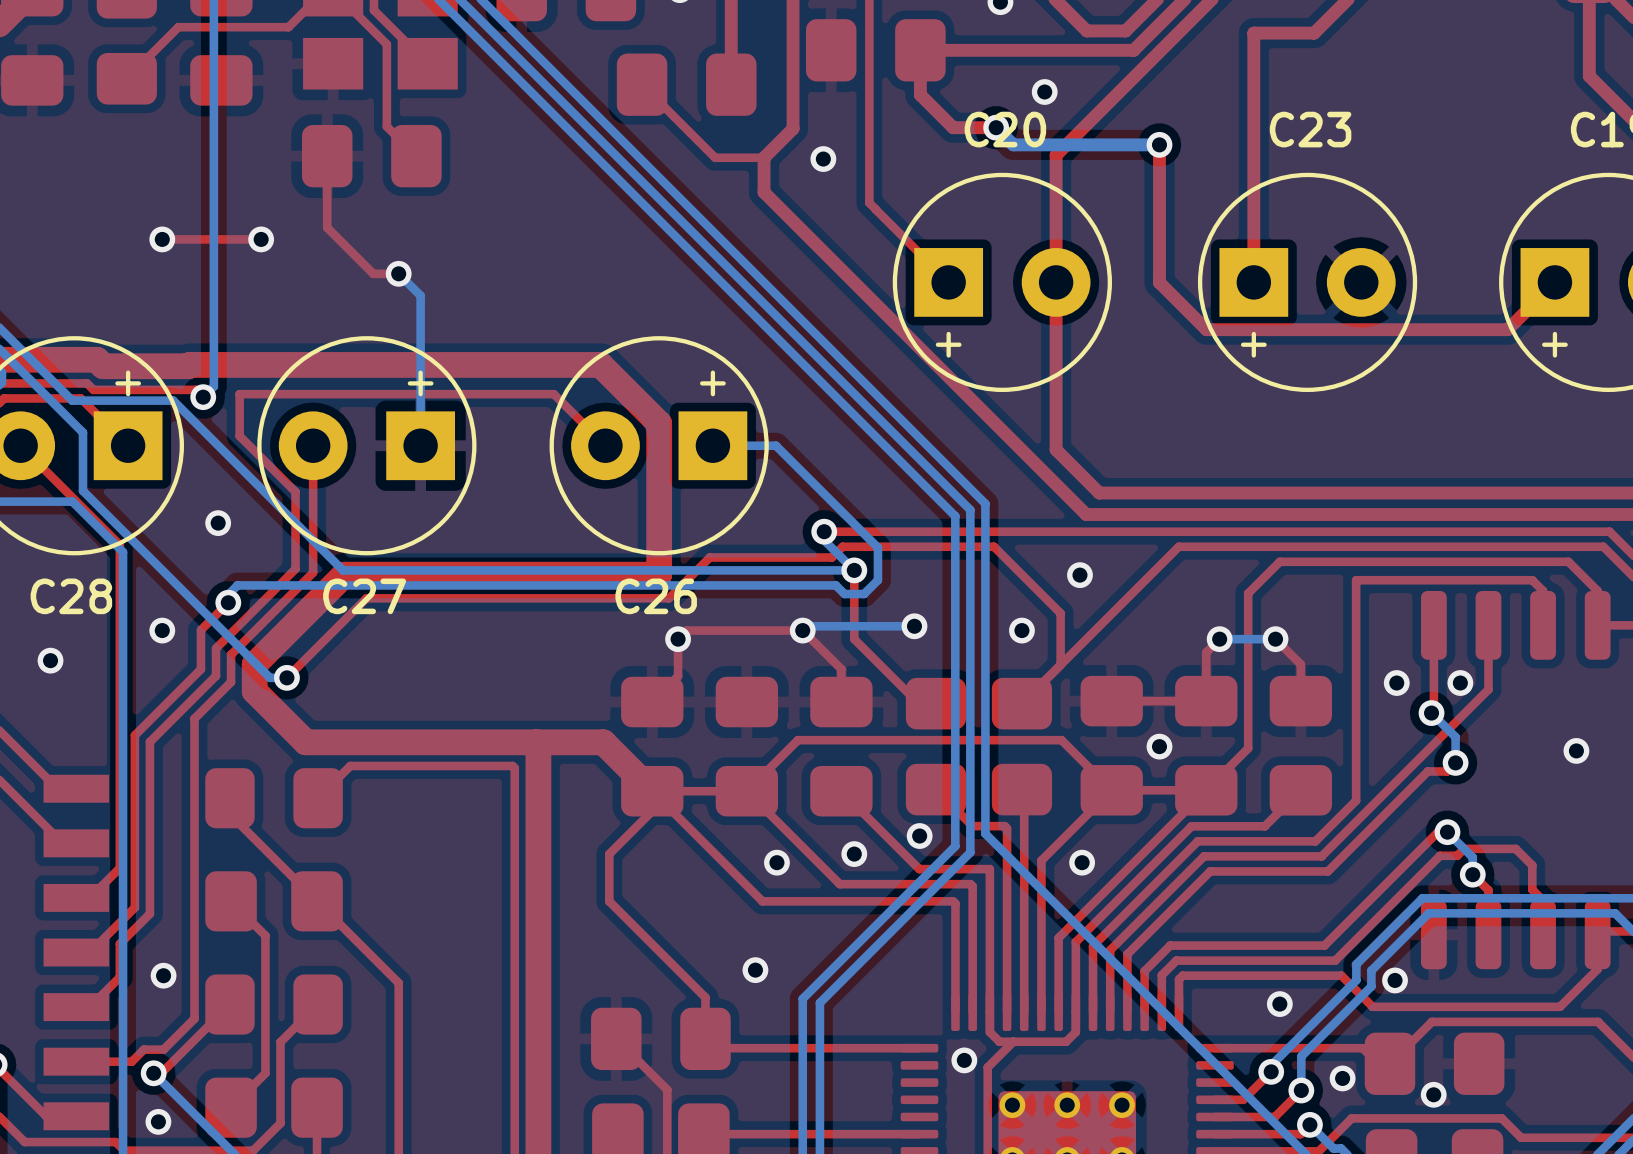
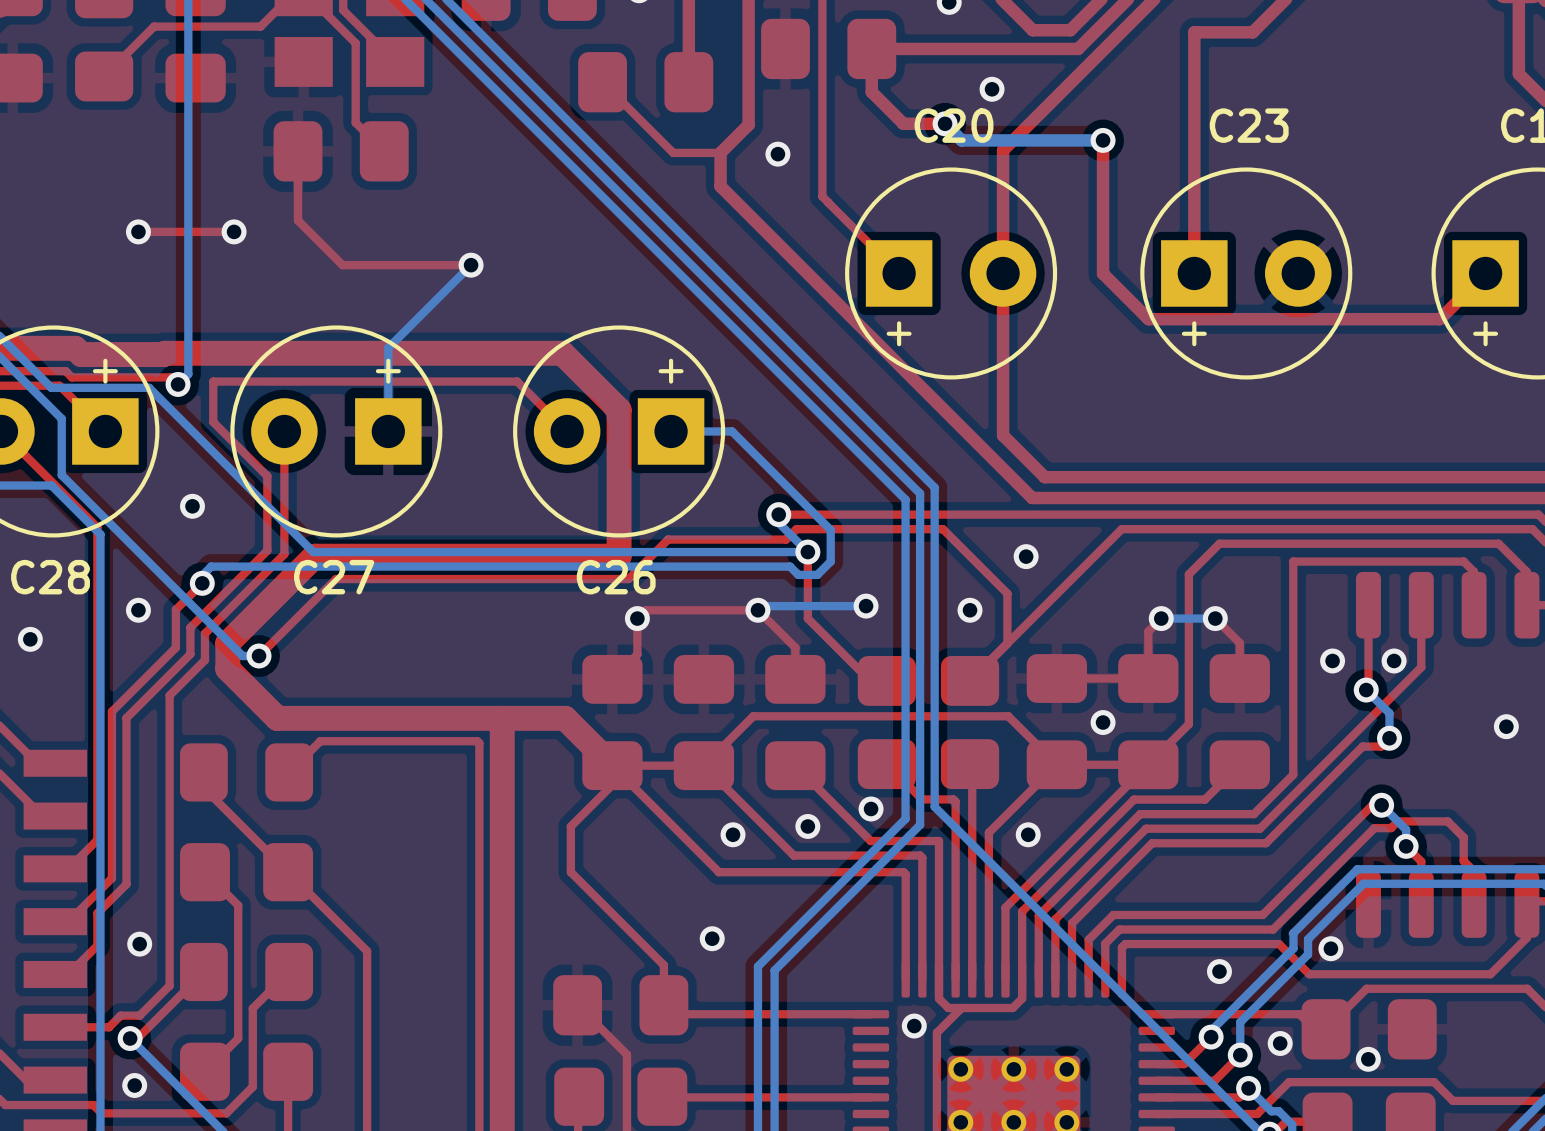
bottom track: (398, 273) (420, 295) (420, 359) -> (471, 265) (388, 347)
via position: (398, 273) -> (471, 265)
top track: none -> (471, 265) (367, 265)

